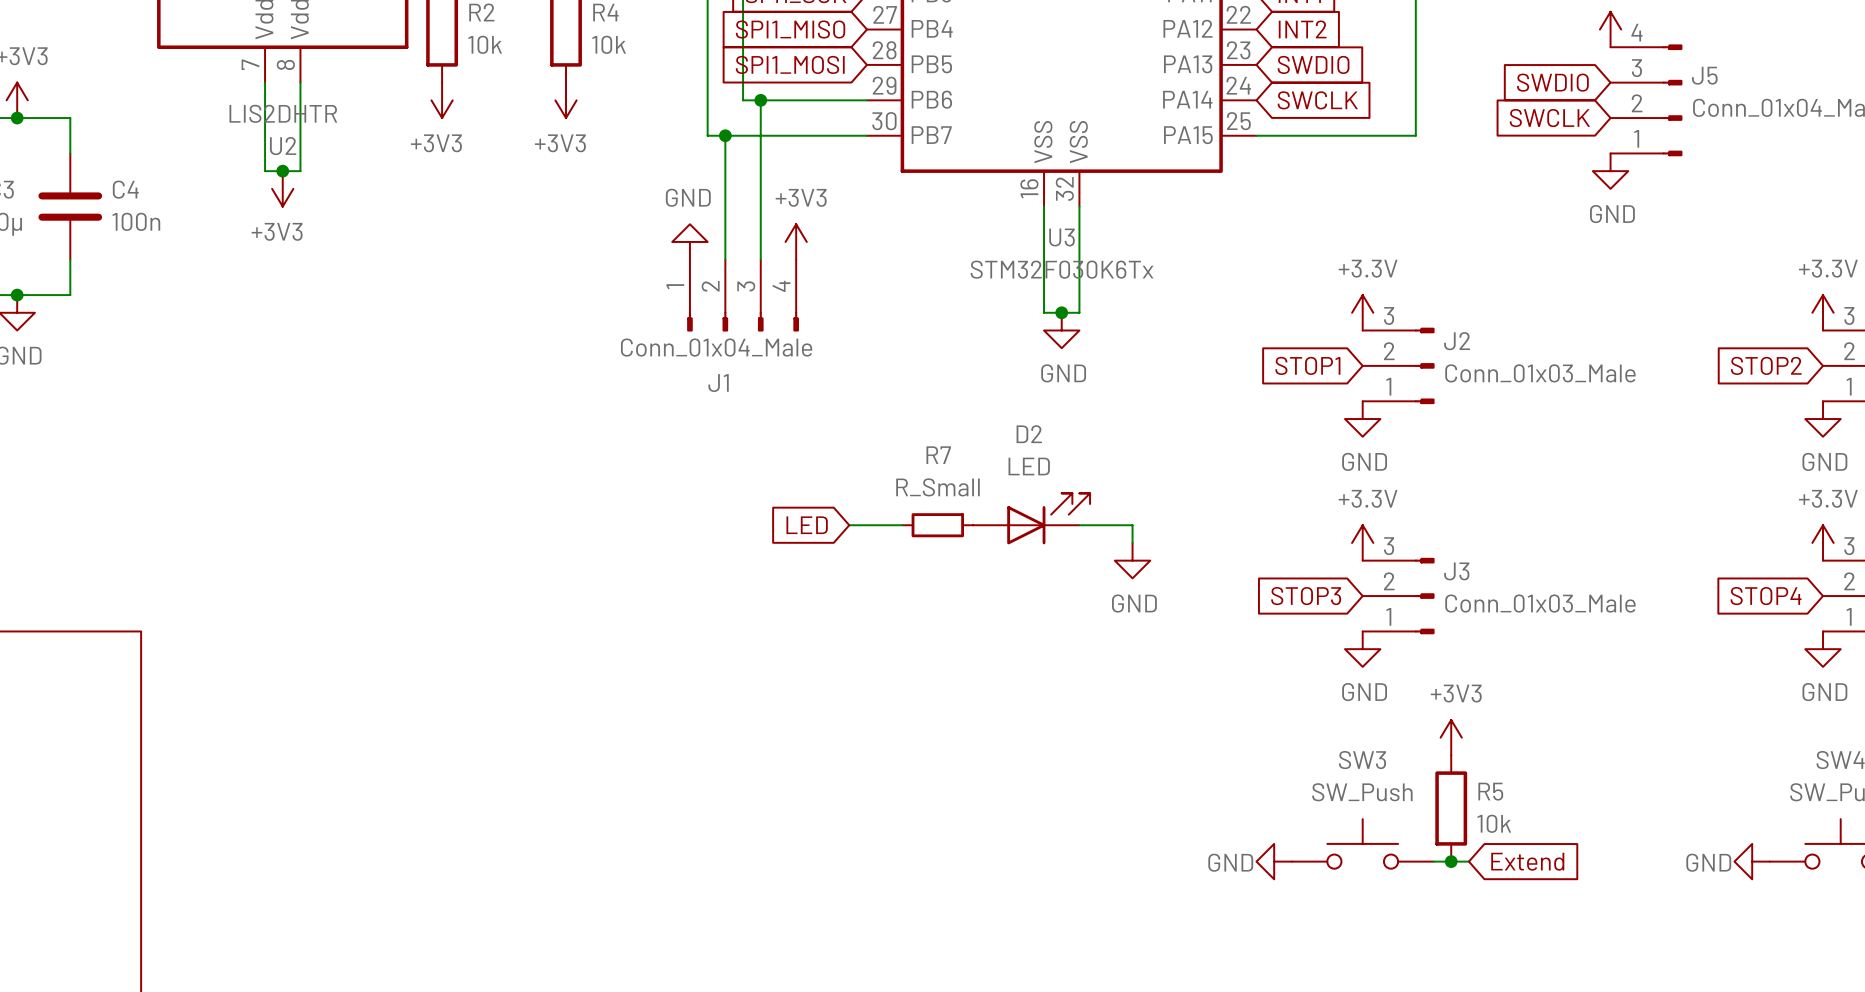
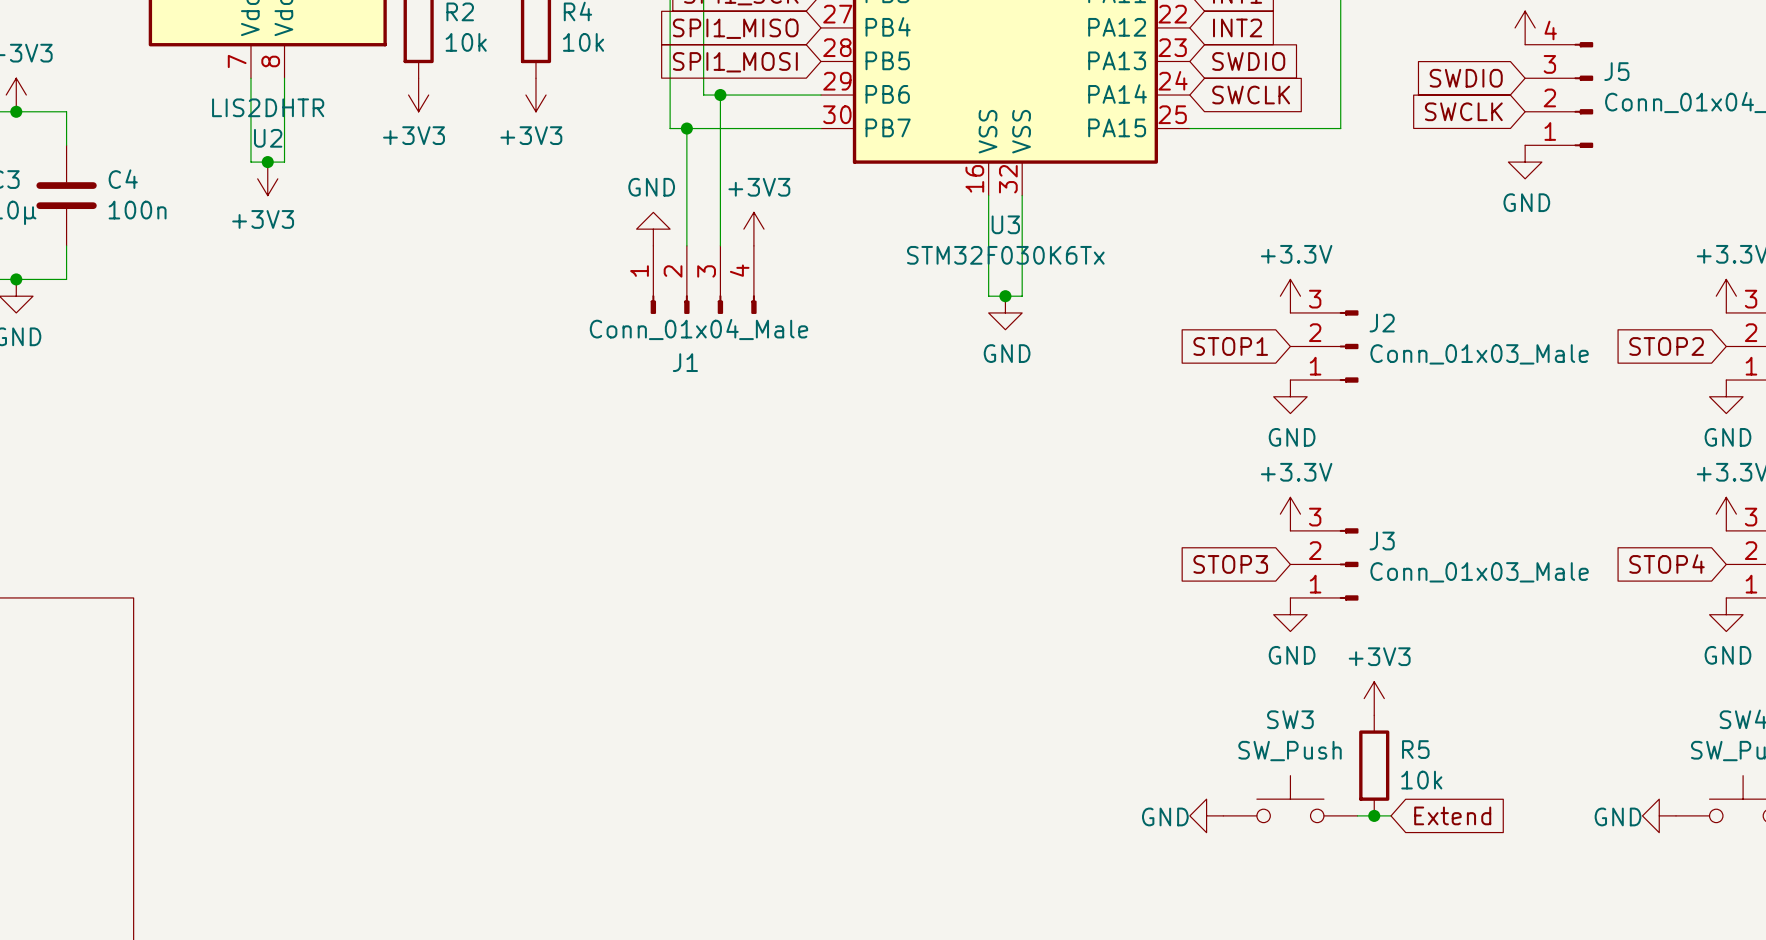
D2: LED (1031, 518) -> none
global label: LED (807, 525) -> none
wire: (849, 525) (902, 525) -> none
R7: R_Small (937, 525) -> none
wire: (1079, 525) (1132, 525) (1132, 542) -> none
power symbol: GND (1132, 560) -> none

